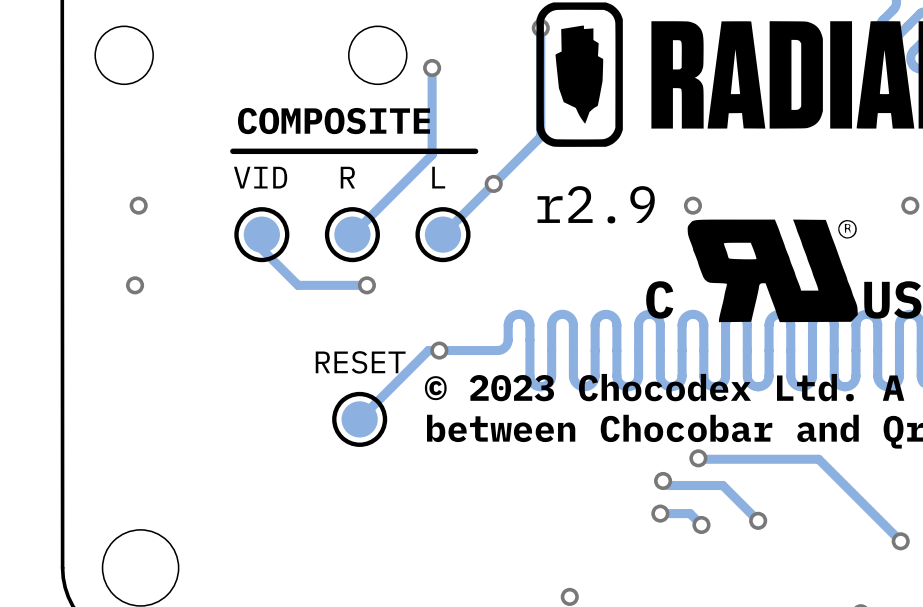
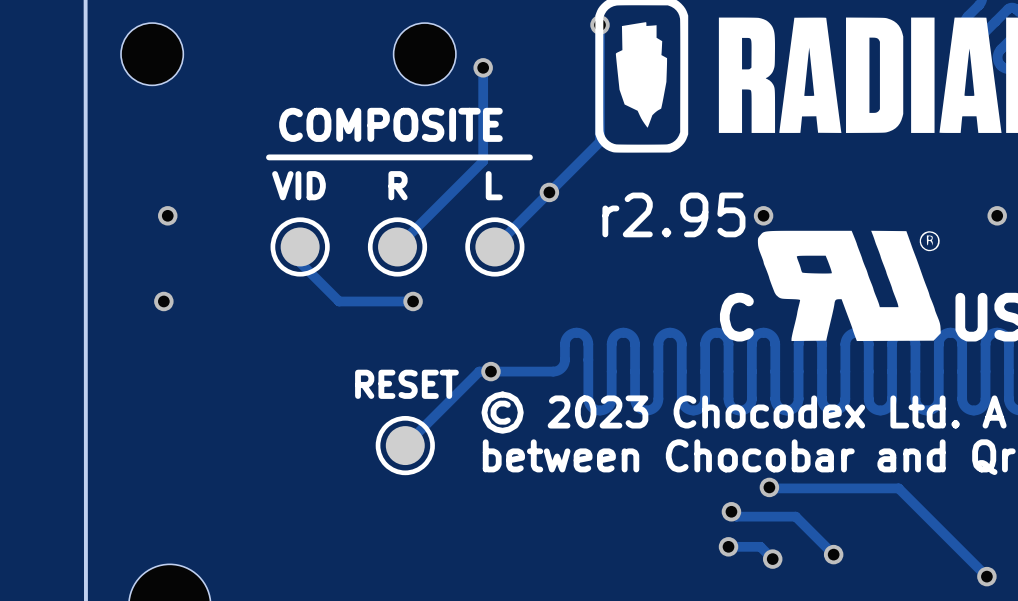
text: r2.9 (596, 204) -> r2.95 (673, 214)

